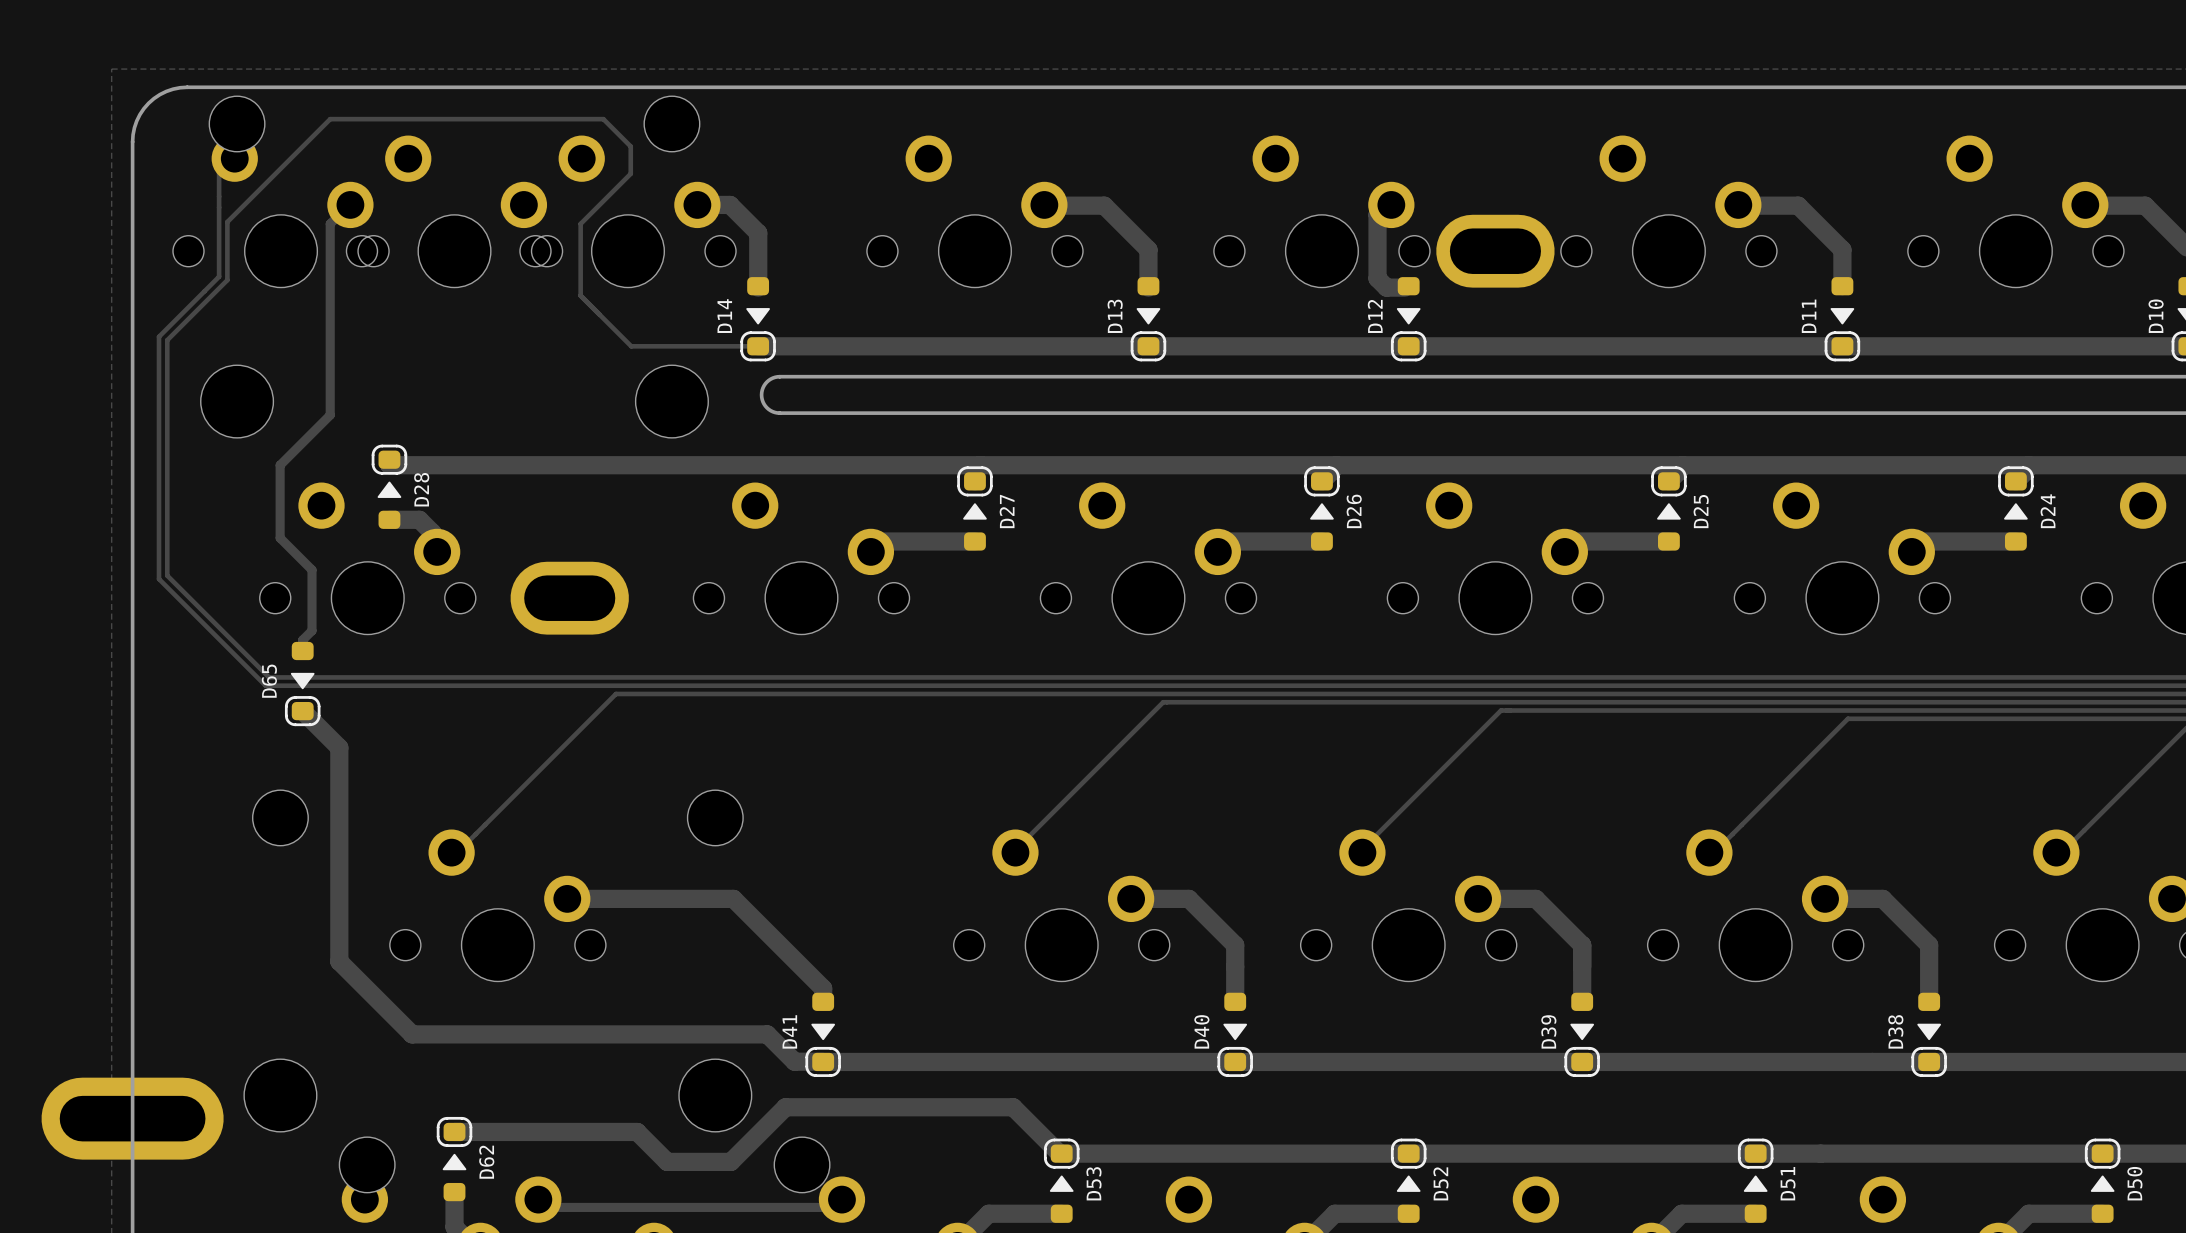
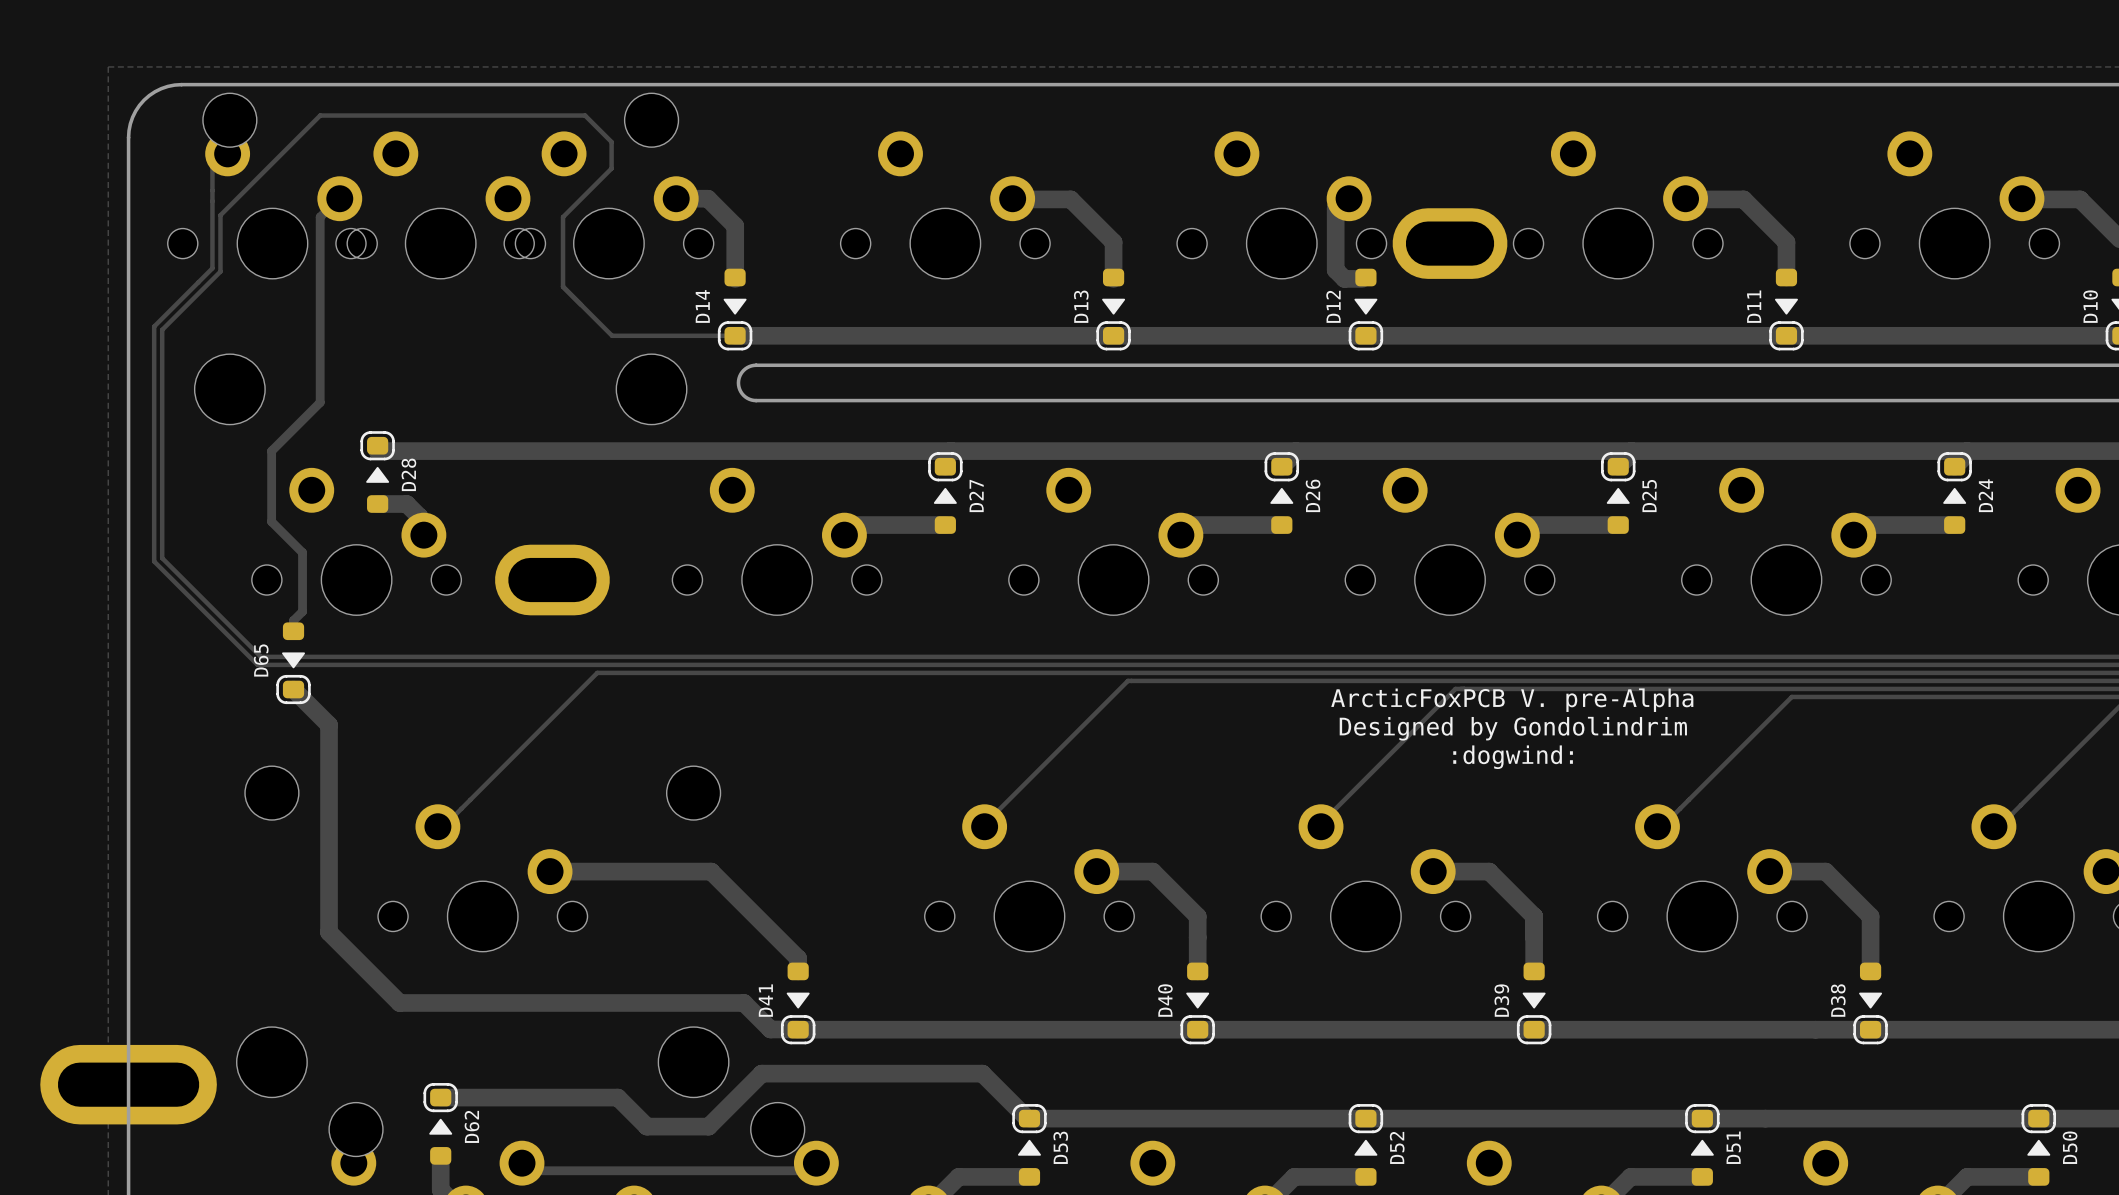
text: none -> ArcticFoxPCB V. pre-Alpha (1512, 700)
text: none -> Designed by Gondolindrim (1513, 728)
text: none -> :dogwind: (1513, 757)

